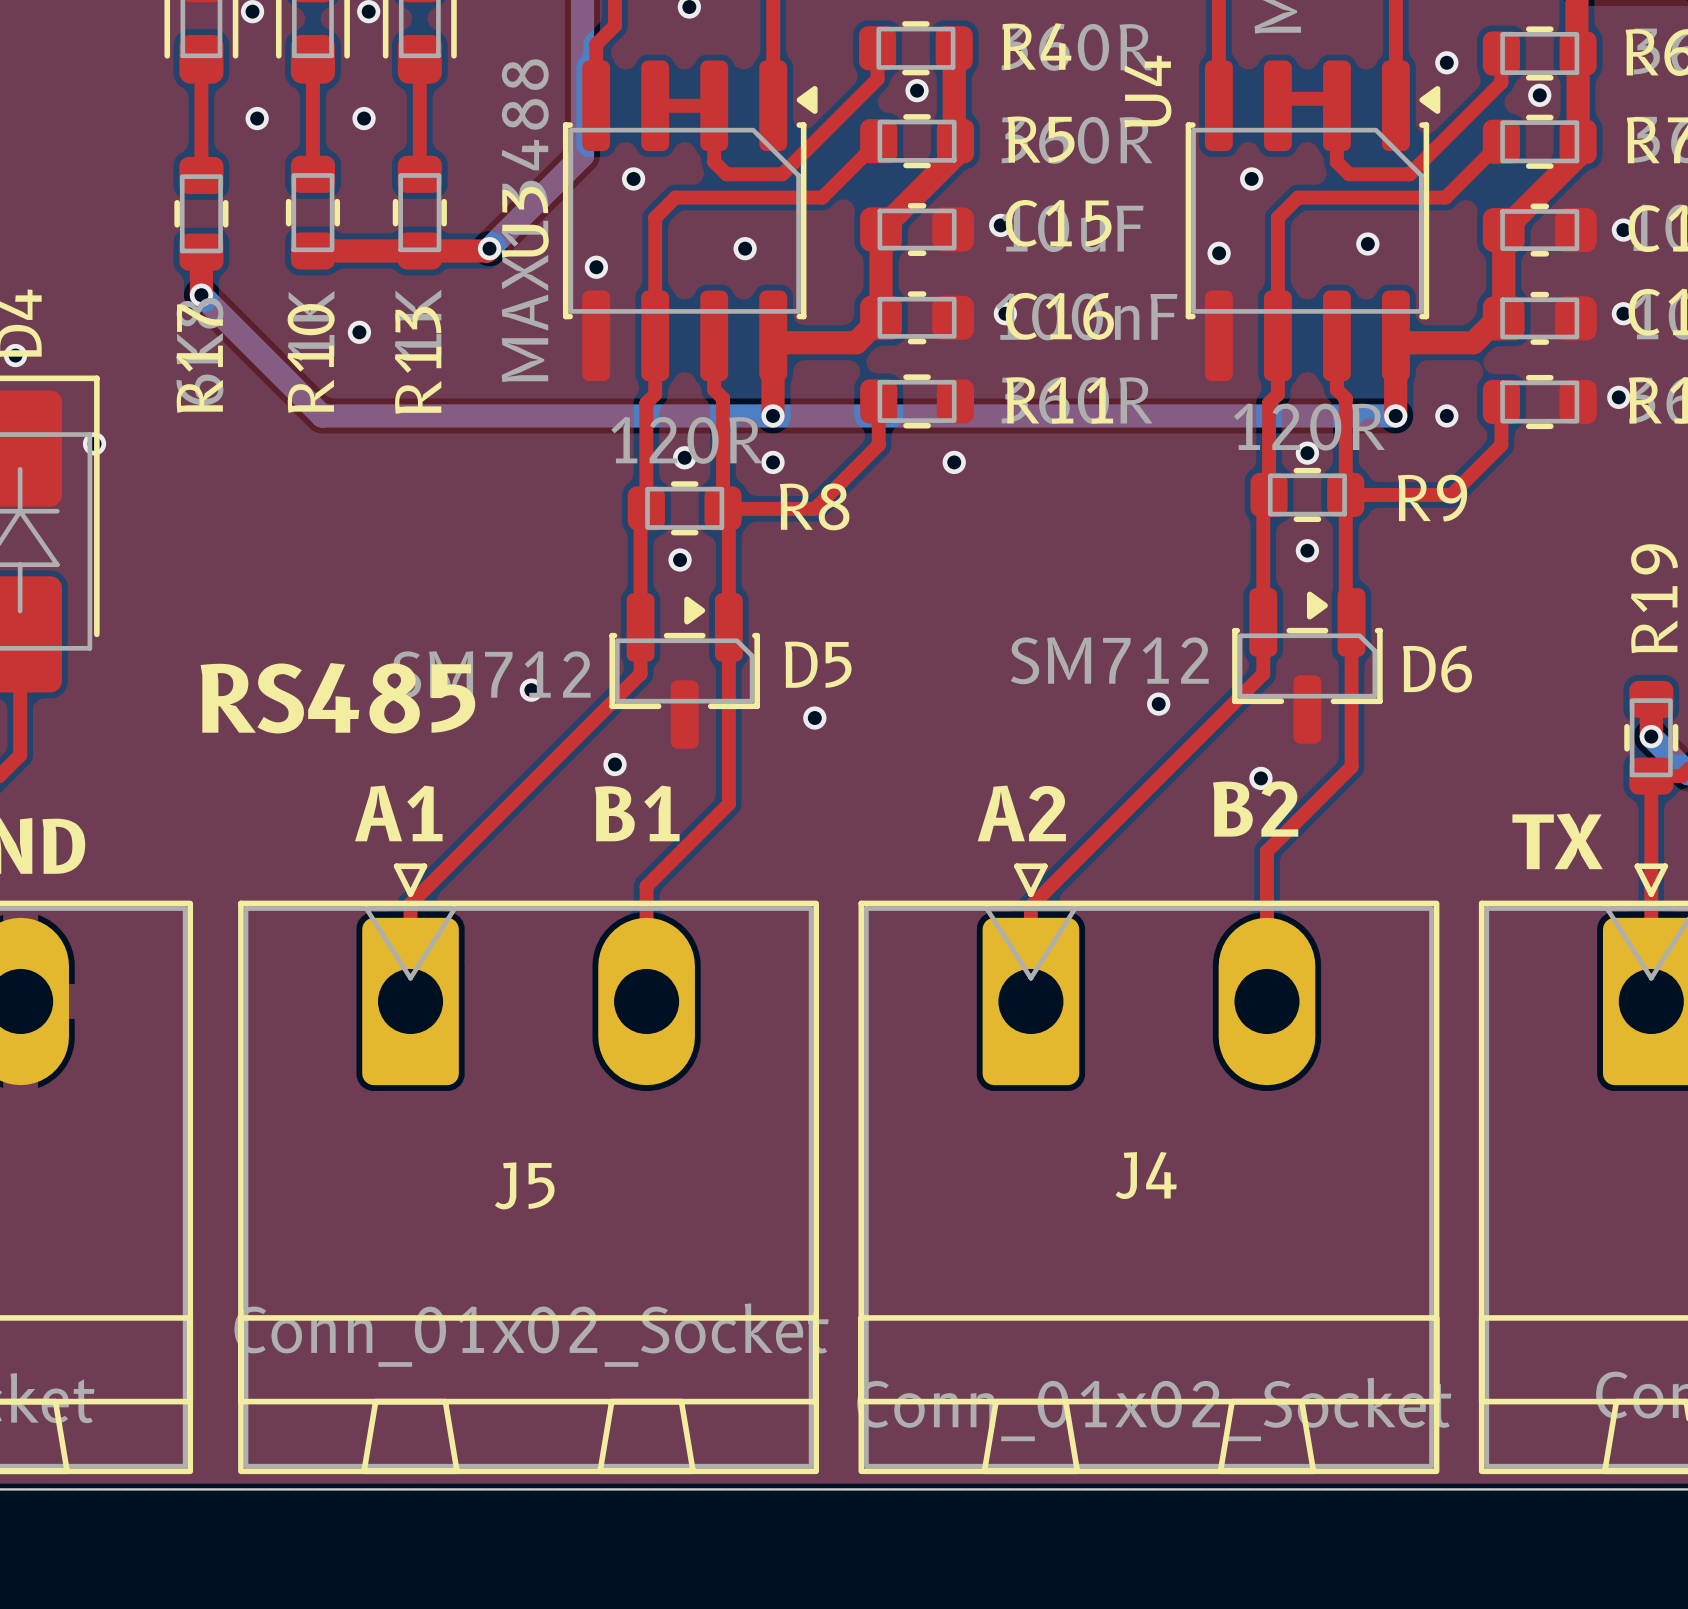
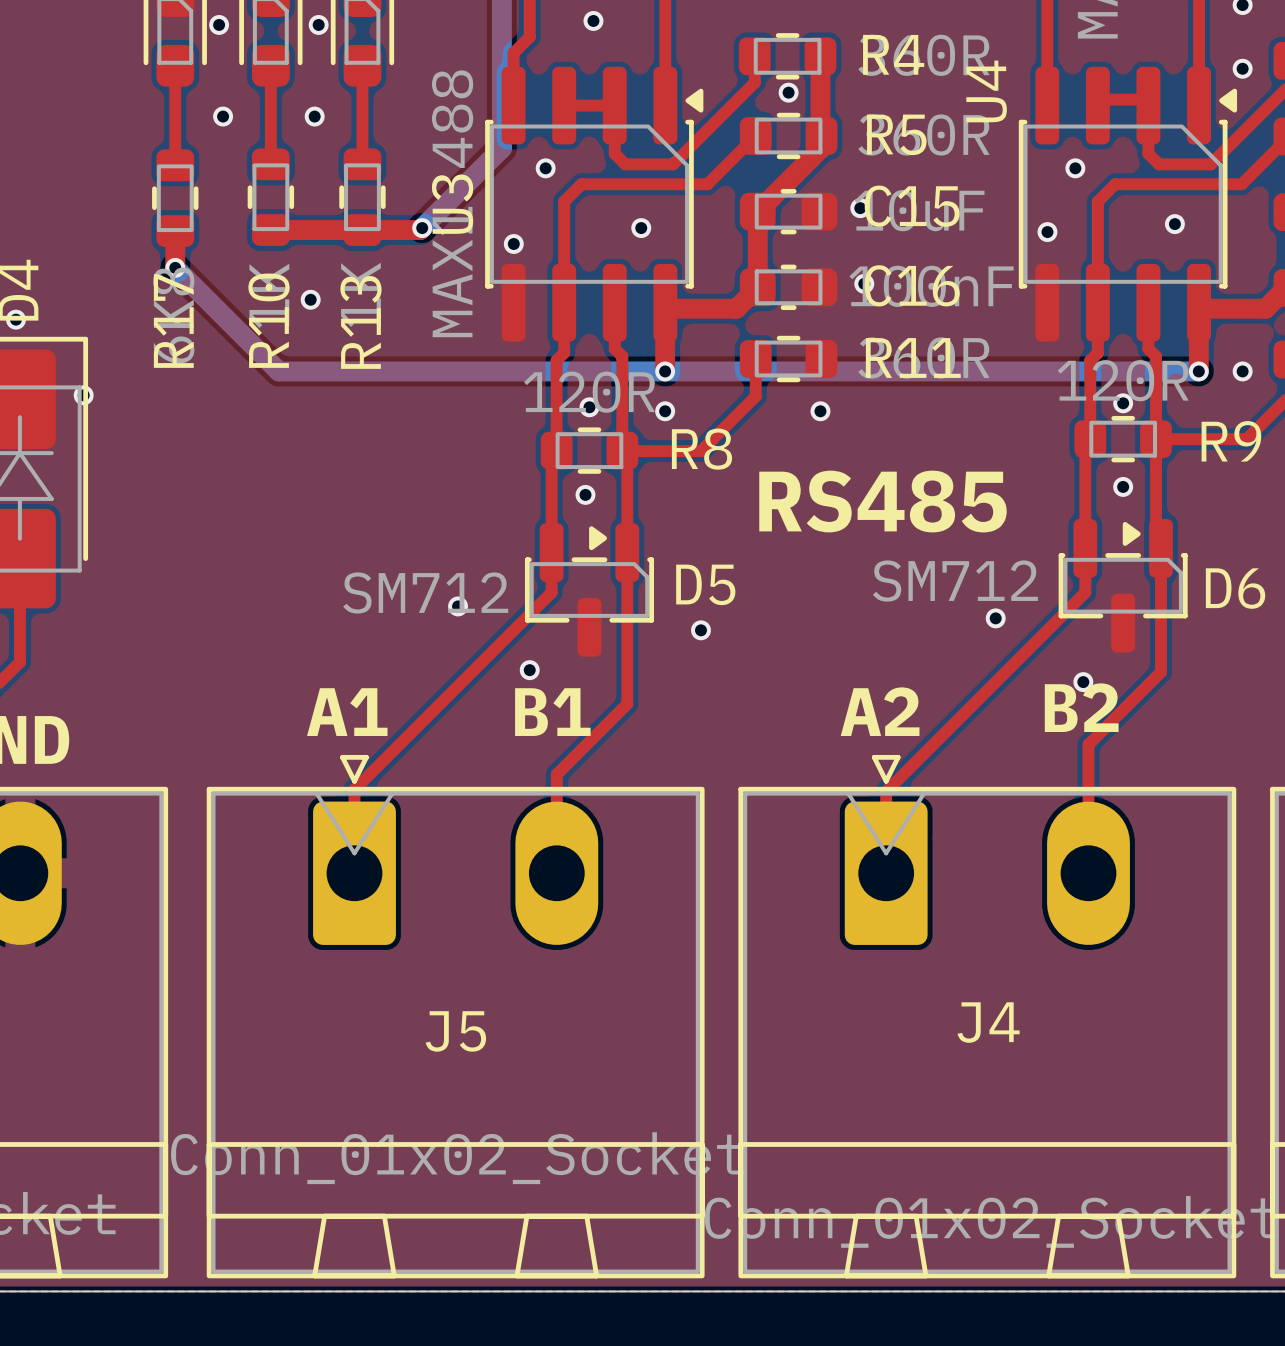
text position: RS485 (337, 698) -> RS485 (882, 501)

